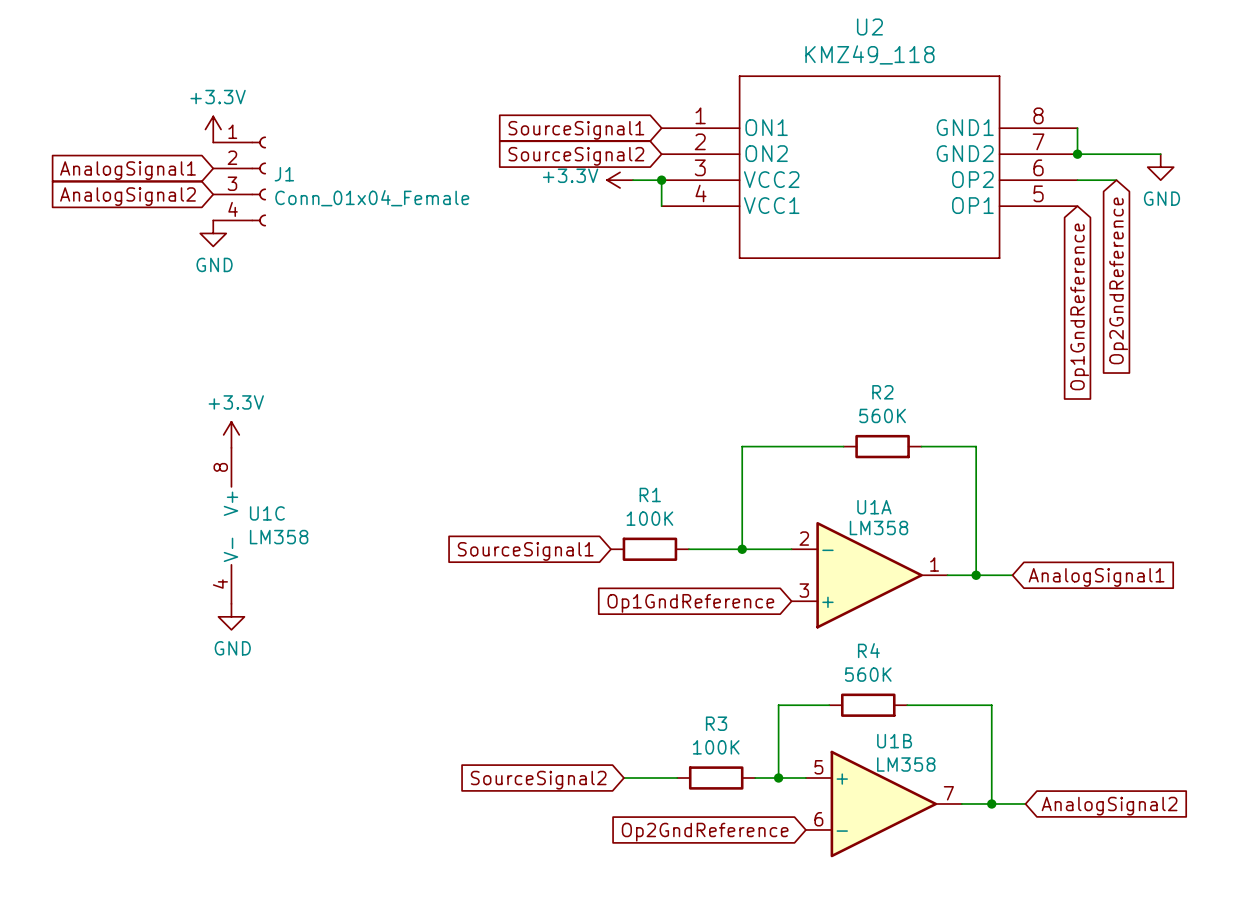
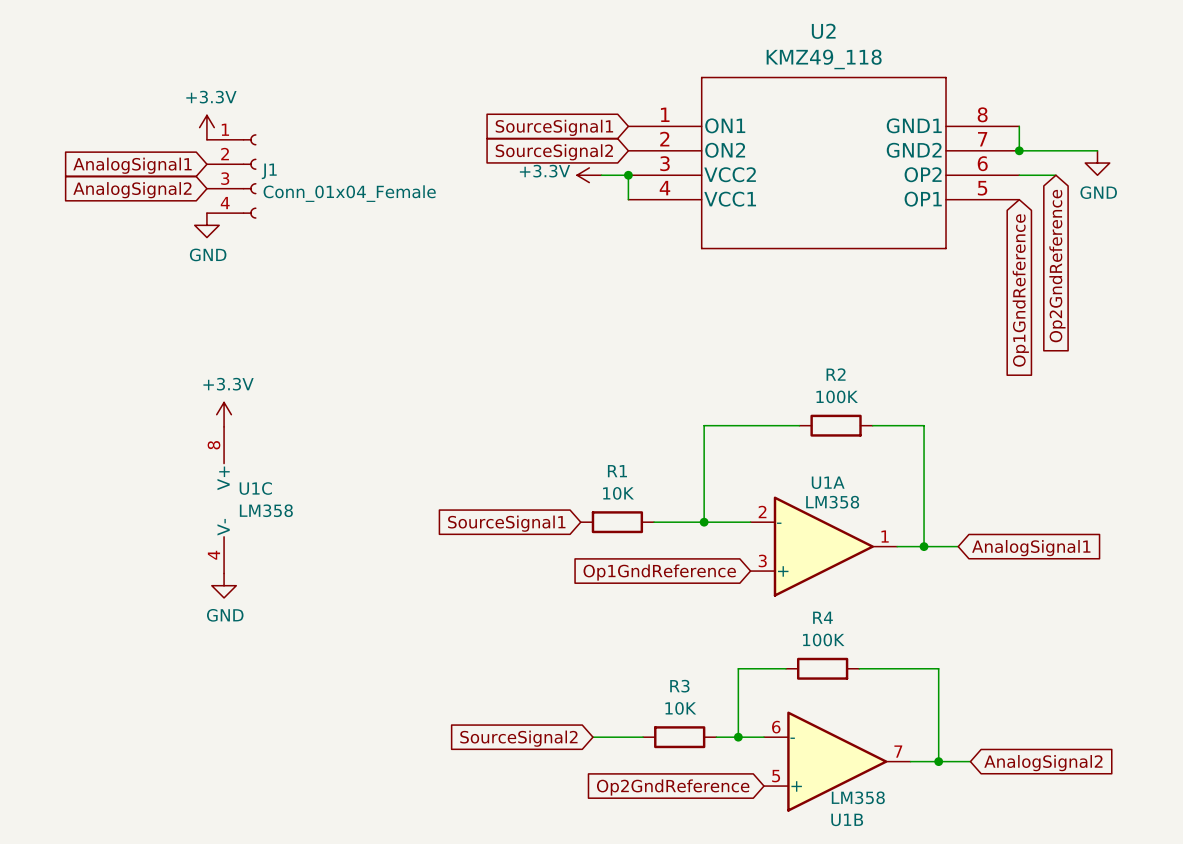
R2 value: 560K (882, 415) -> 100K (837, 396)
R1 value: 100K (649, 518) -> 10K (618, 493)
R4 value: 560K (868, 674) -> 100K (823, 639)
R3 value: 100K (716, 747) -> 10K (680, 708)
U1B flip: as is (883, 803) -> up-down (837, 761)

